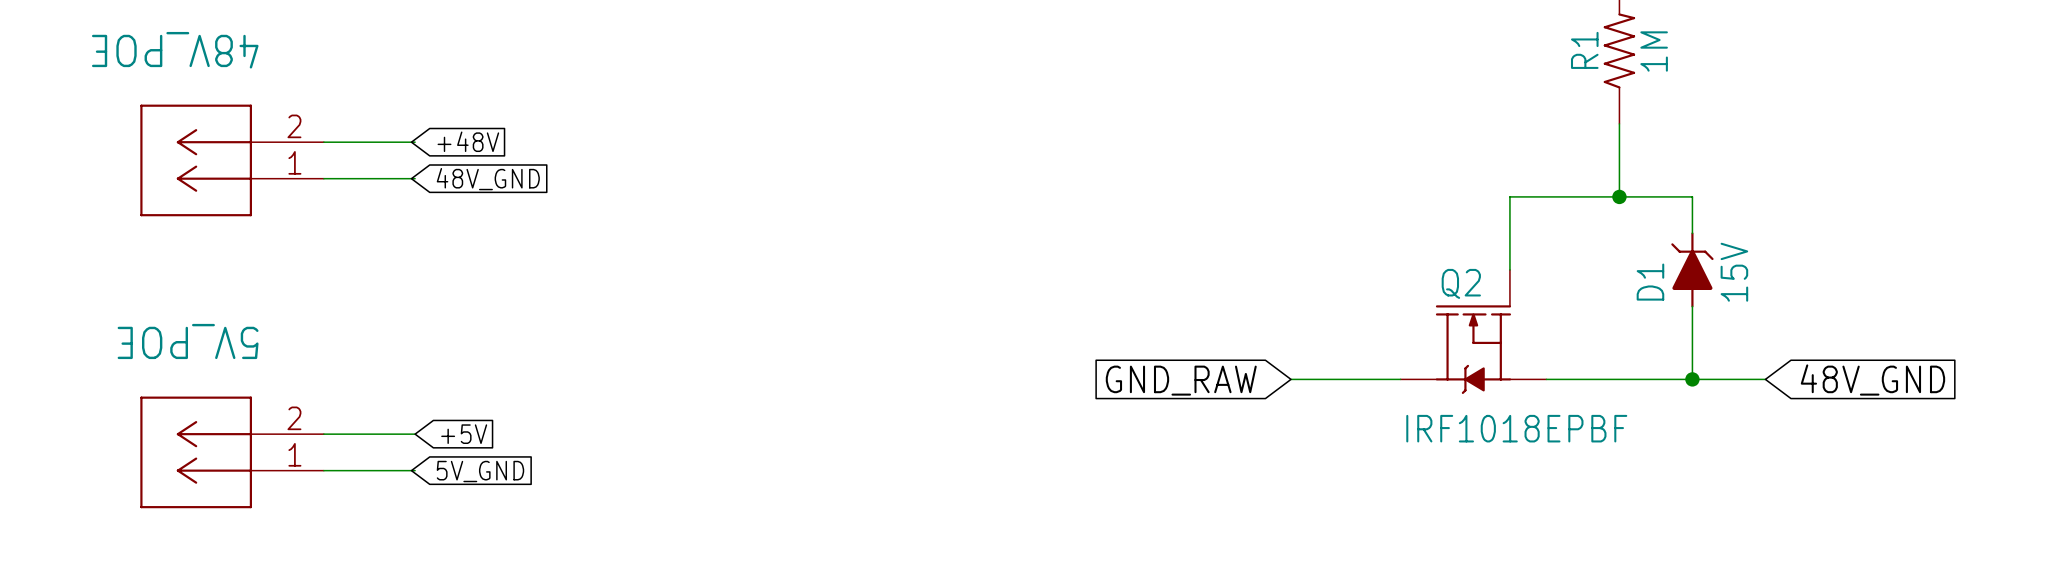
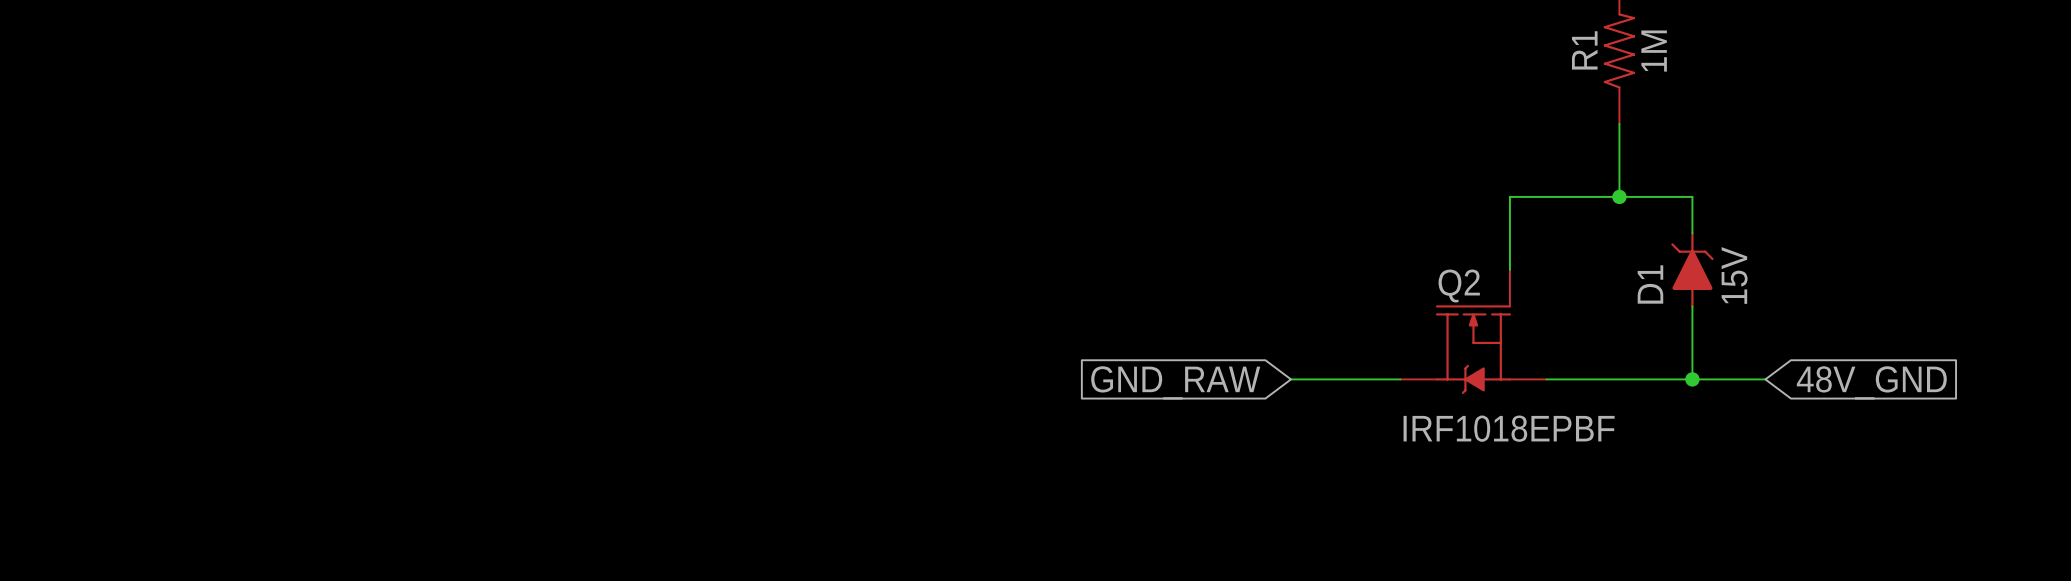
global label: +48V (468, 141) -> none
wire: (323, 142) (415, 142) -> none
48V_POE: (232, 160) -> none
wire: (323, 178) (415, 178) -> none
global label: 48V_GND (488, 179) -> none
wire: (323, 434) (415, 434) -> none
global label: +5V (464, 434) -> none
5V_POE: (232, 452) -> none
wire: (323, 470) (415, 470) -> none
global label: 5V_GND (480, 471) -> none

